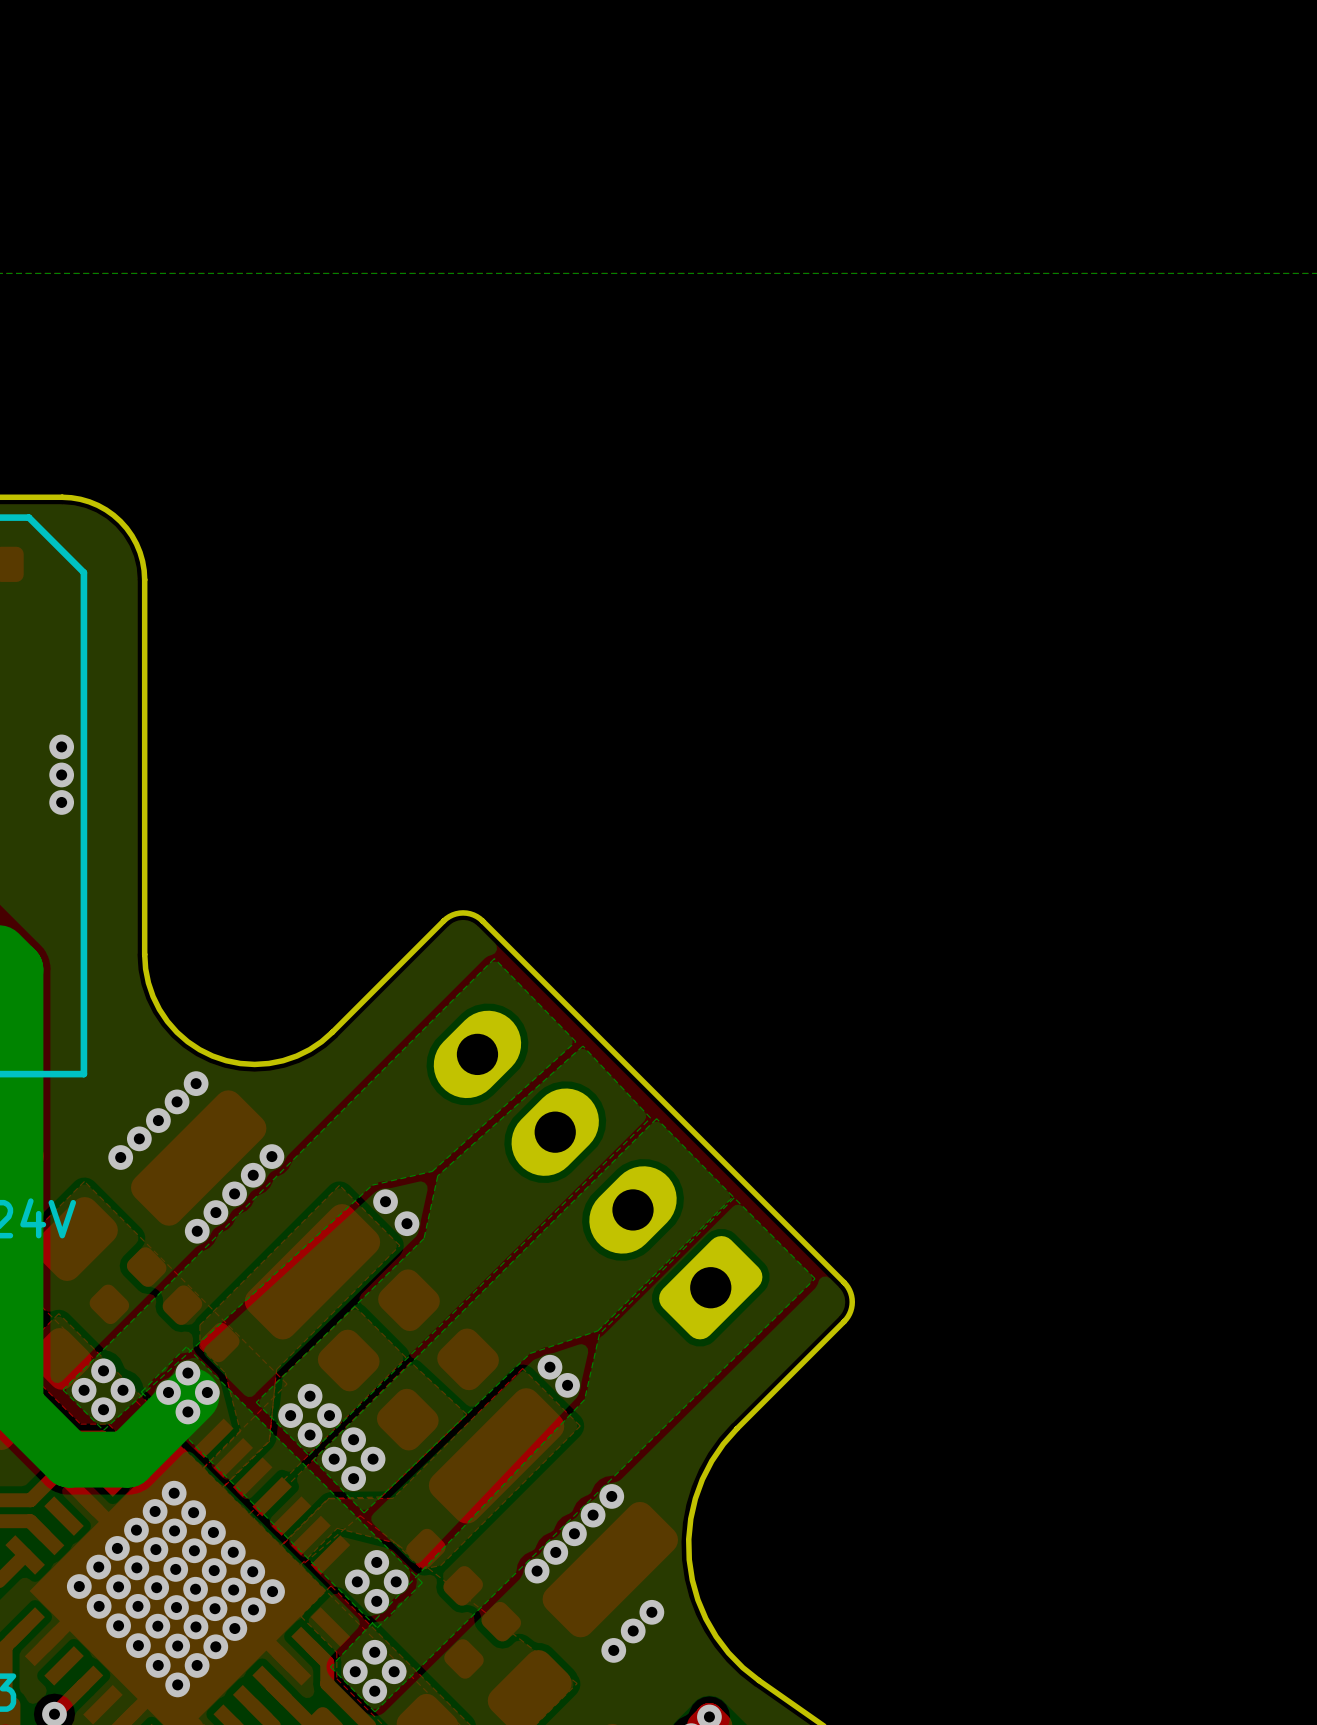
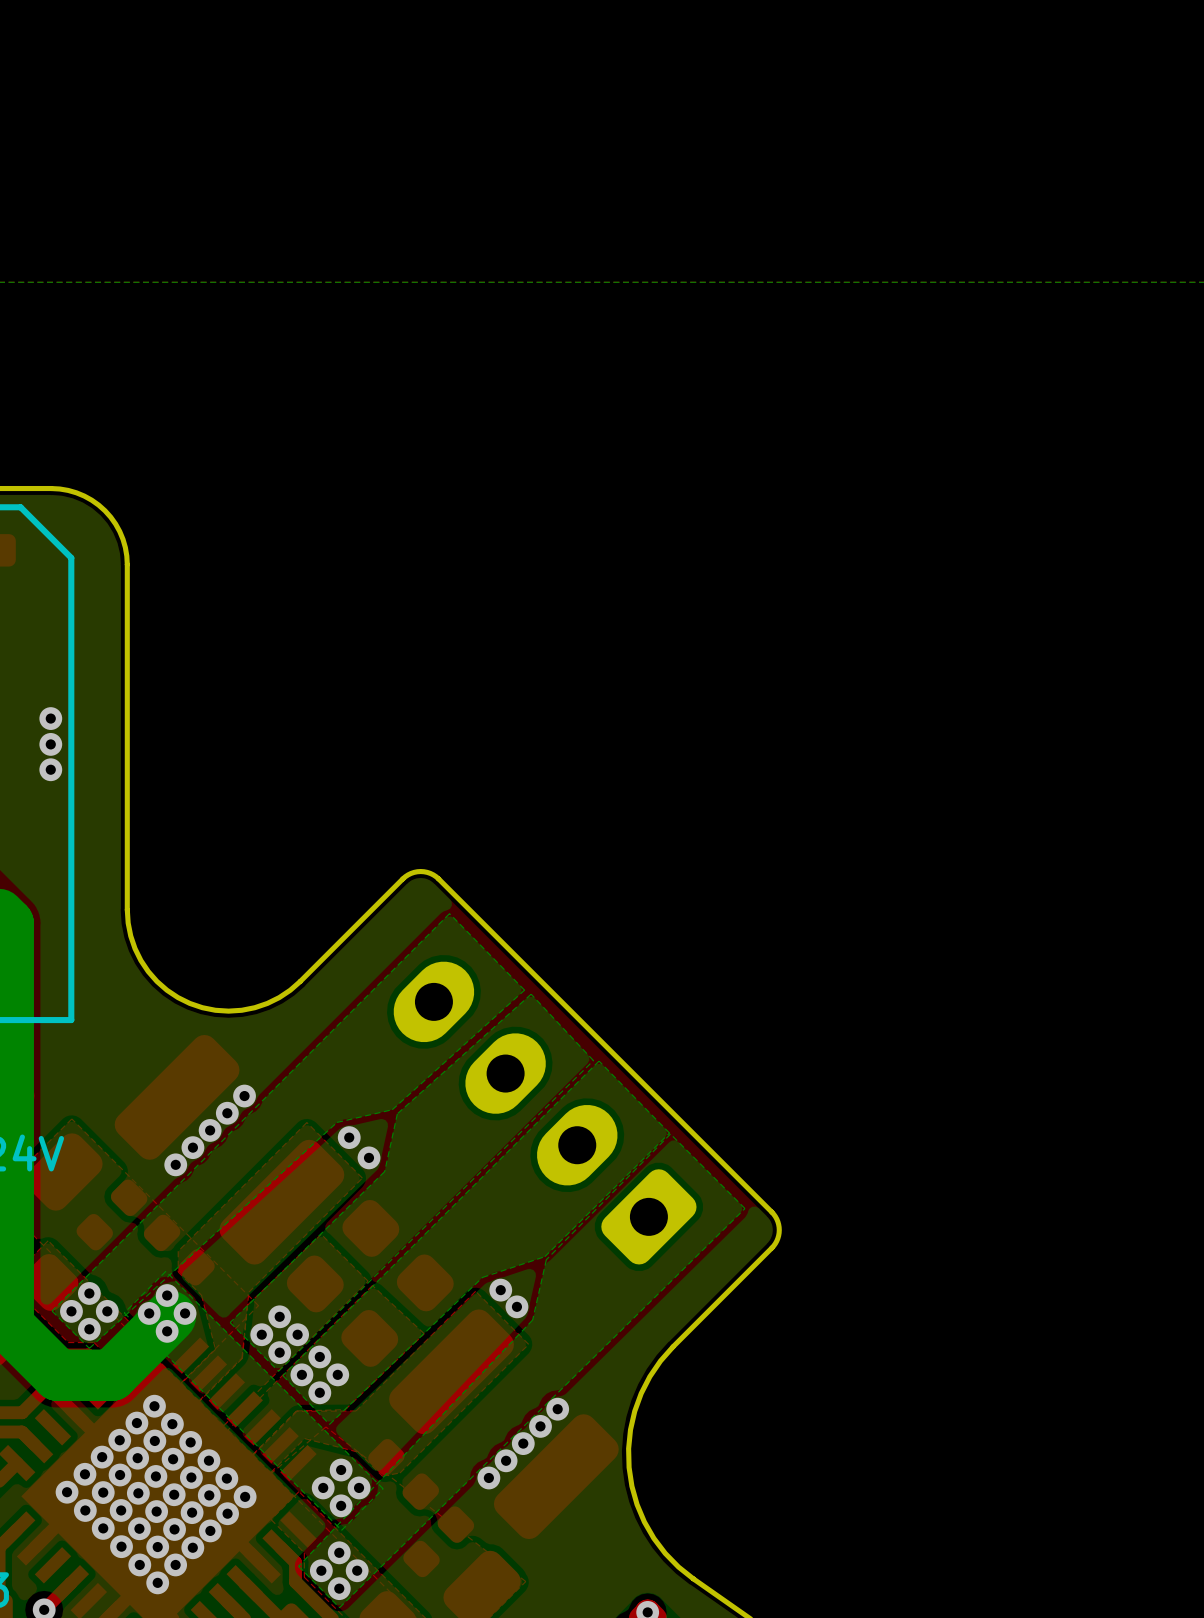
via: (196, 1083) -> none
via: (177, 1101) -> none
via: (158, 1120) -> none
via: (139, 1138) -> none
via: (120, 1157) -> none
via: (651, 1612) -> none
via: (633, 1630) -> none
via: (613, 1650) -> none

